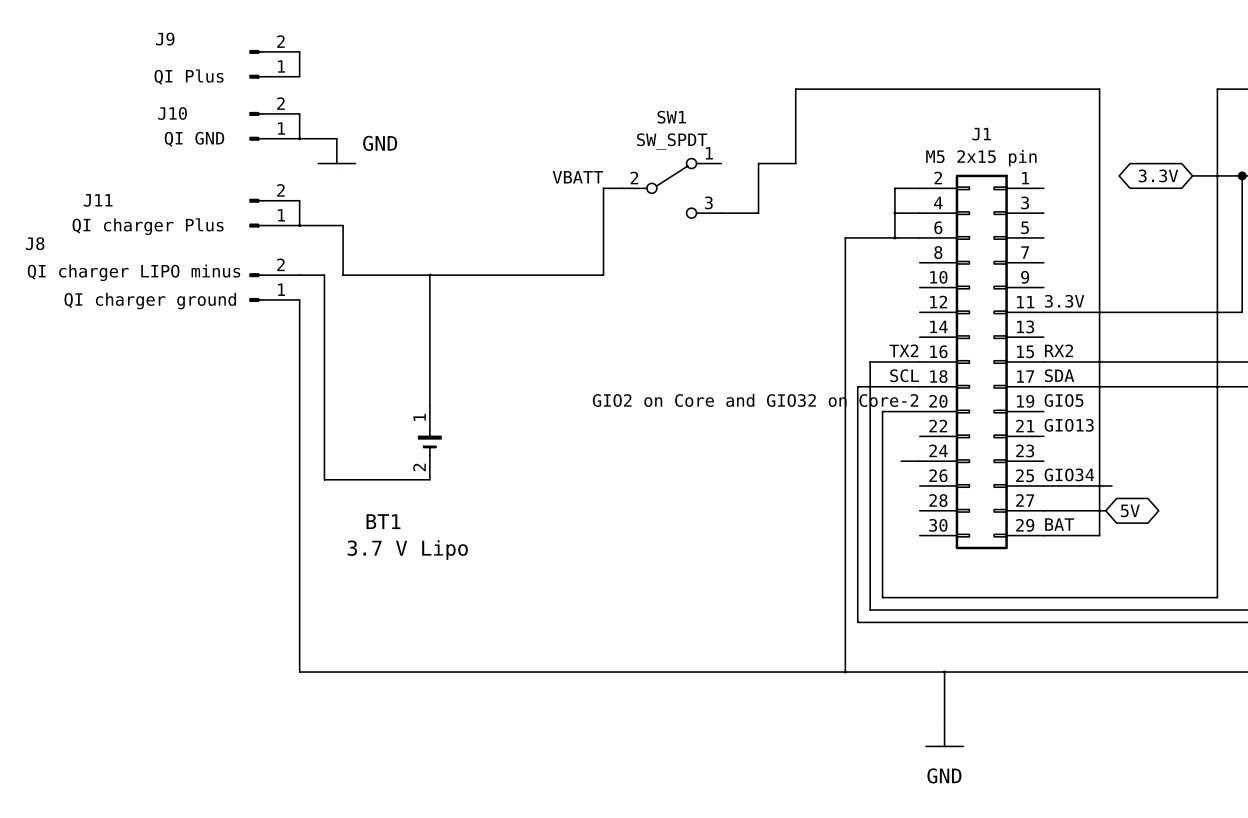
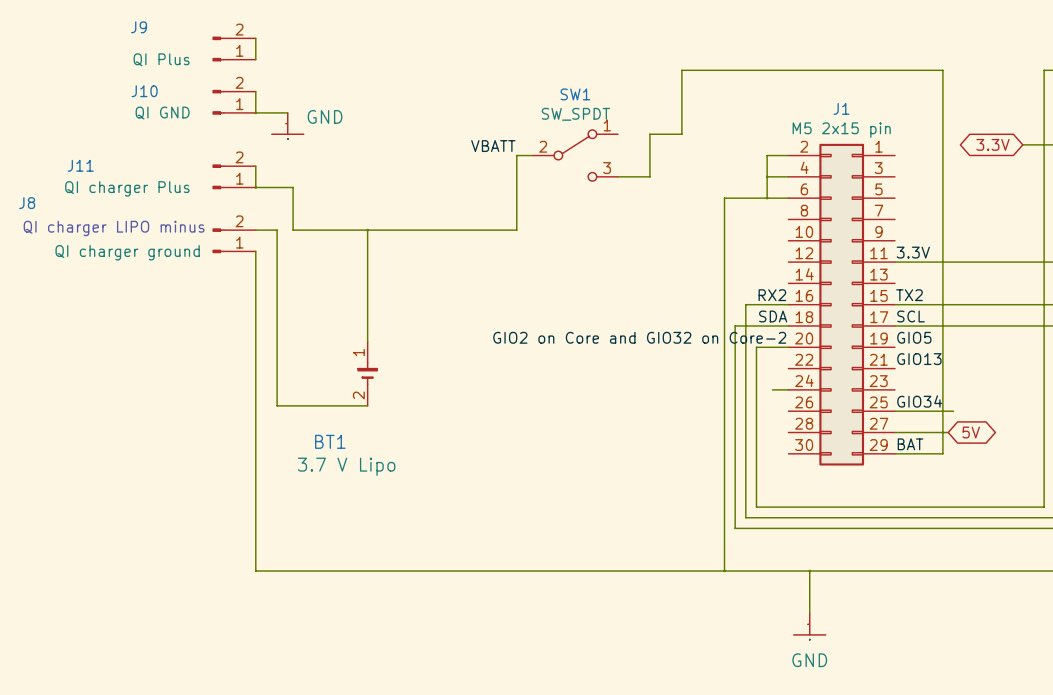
label: TX2 (903, 350) -> RX2 (772, 295)
label: RX2 (1059, 350) -> TX2 (909, 295)
label: SCL (904, 375) -> SDA (773, 316)
label: SDA (1059, 375) -> SCL (911, 316)

